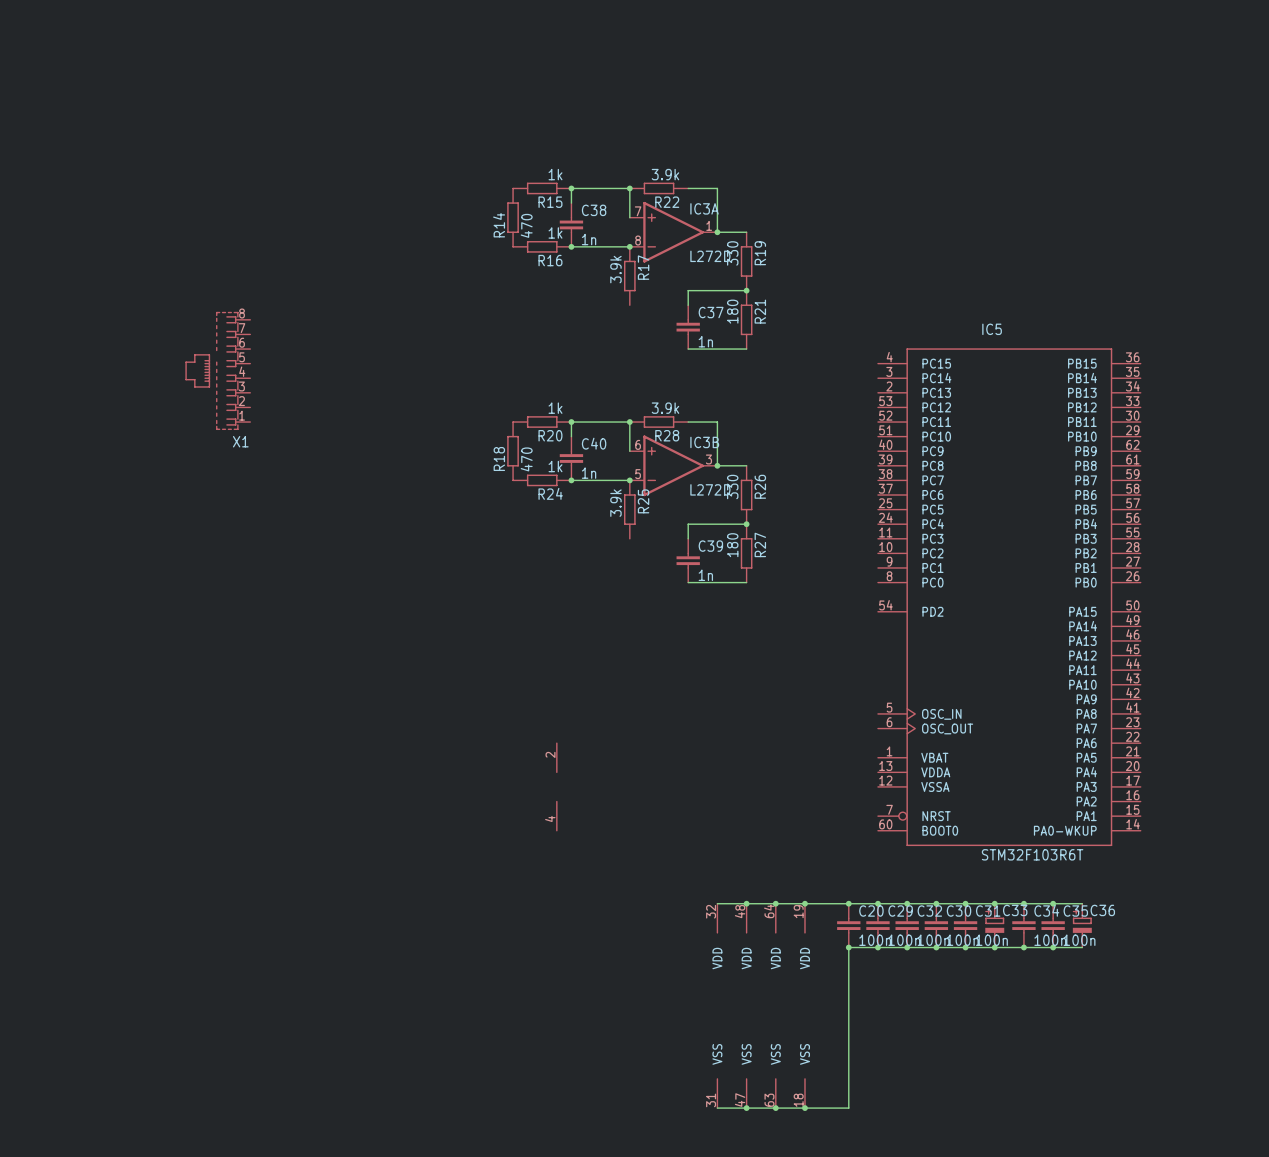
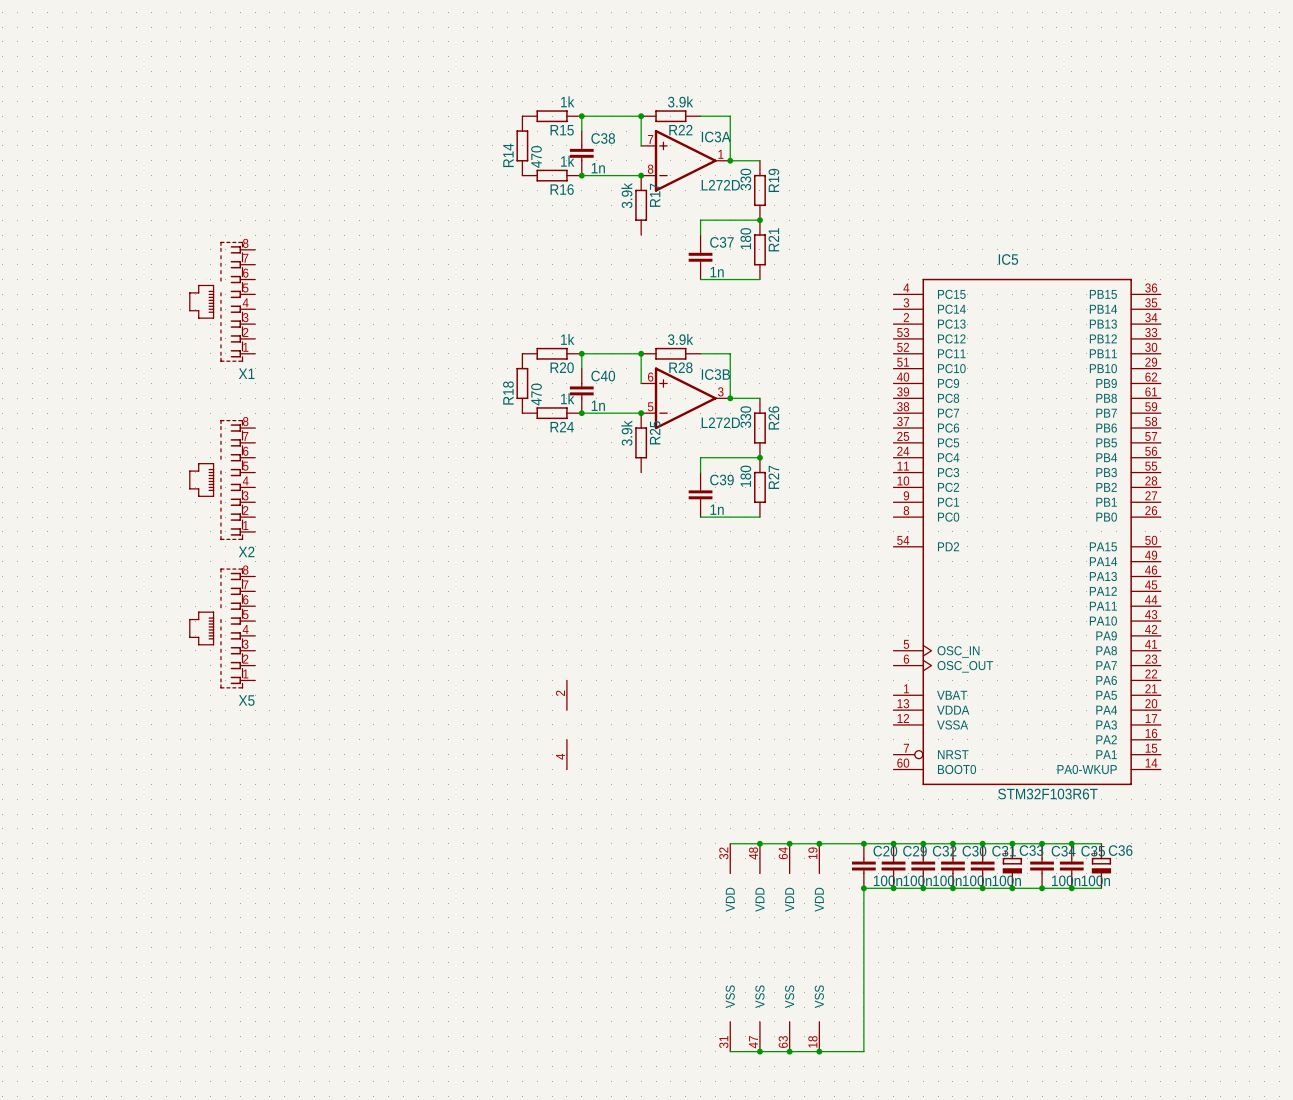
X2: none -> (222, 479)
X5: none -> (222, 628)

